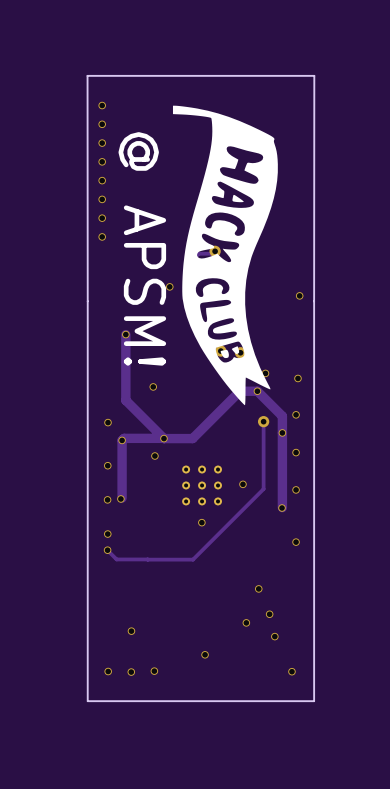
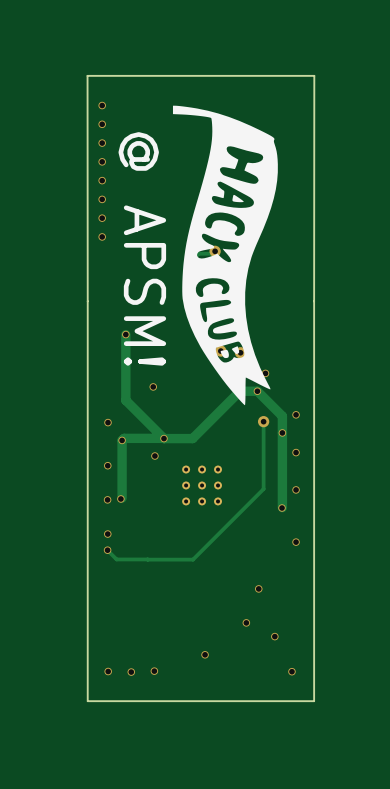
via: (169, 286) -> none
via: (299, 295) -> none
via: (297, 378) -> none
via: (242, 484) -> none
via: (201, 522) -> none
via: (269, 614) -> none
via: (131, 631) -> none

